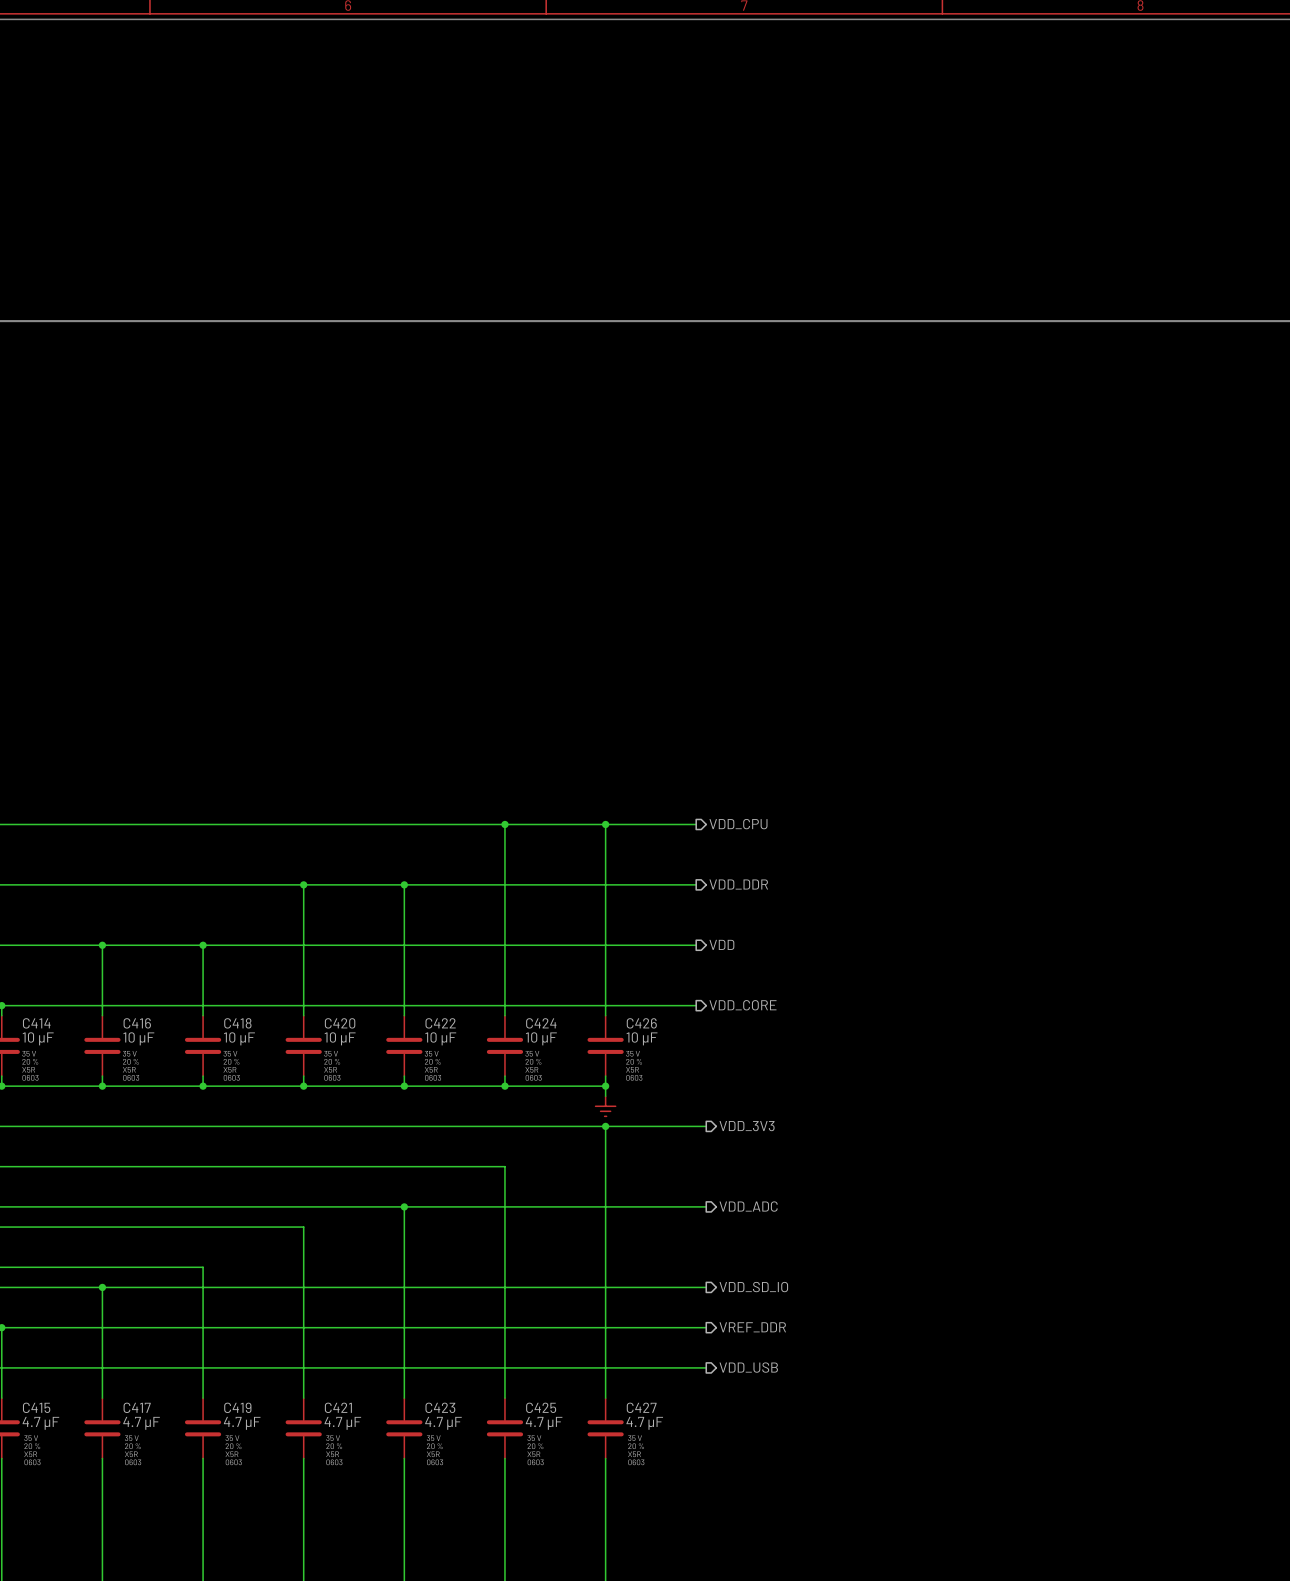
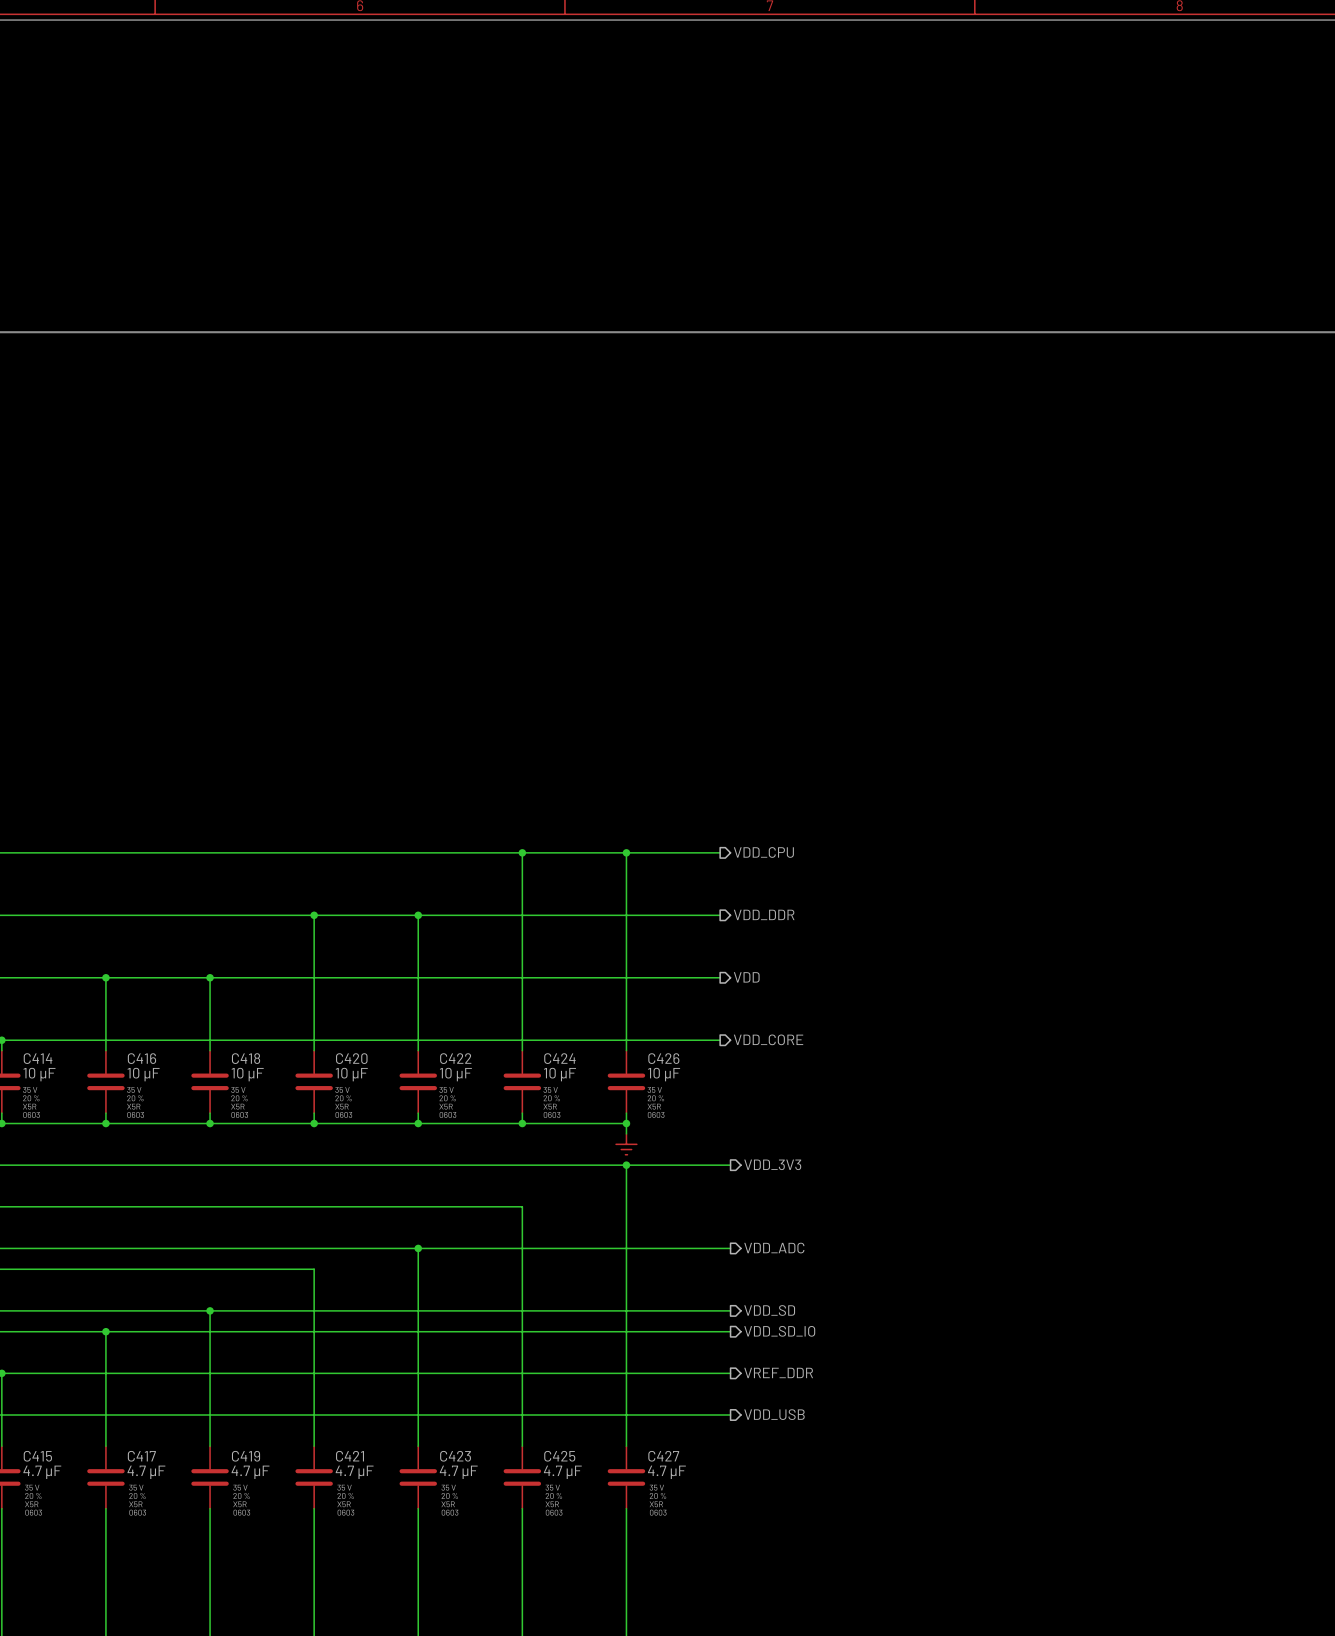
hierarchical label: none -> VDD_SD (769, 1310)
wire: none -> (210, 1310) (730, 1310)
junction: none -> (210, 1310)

